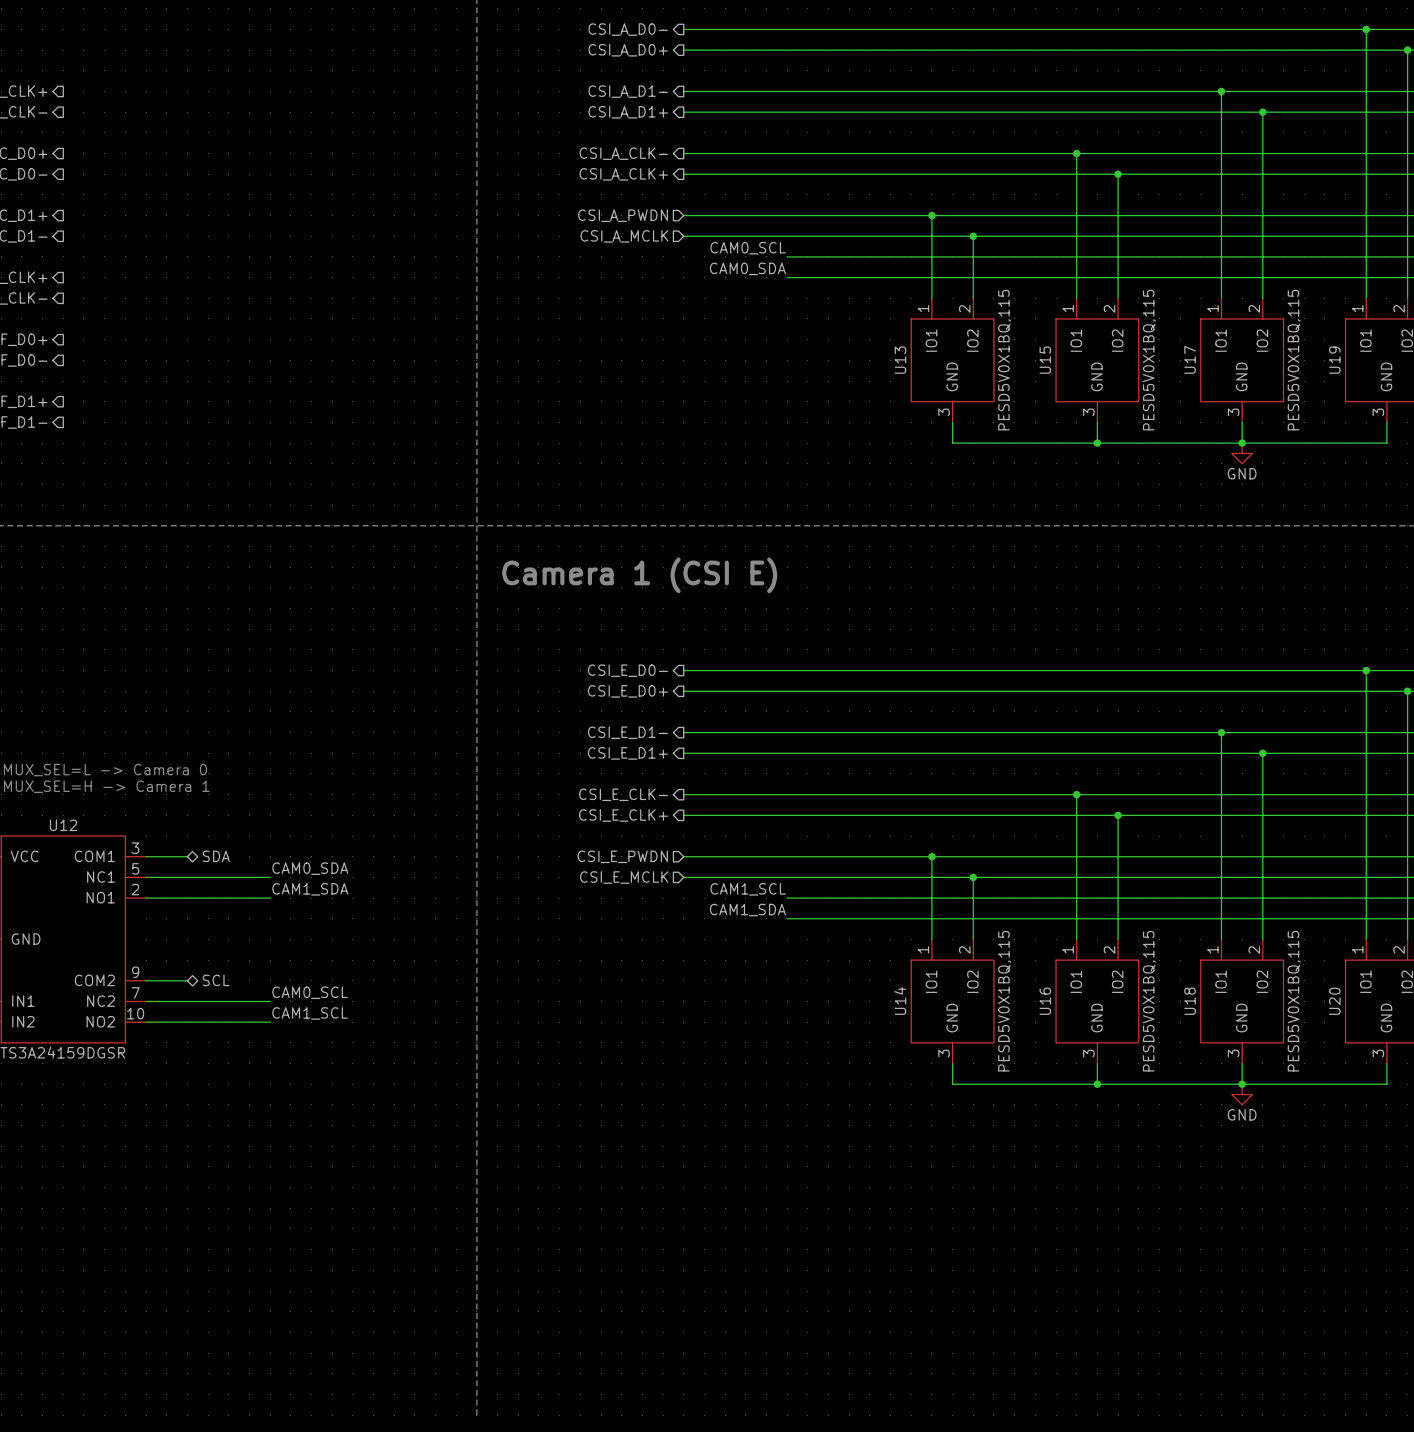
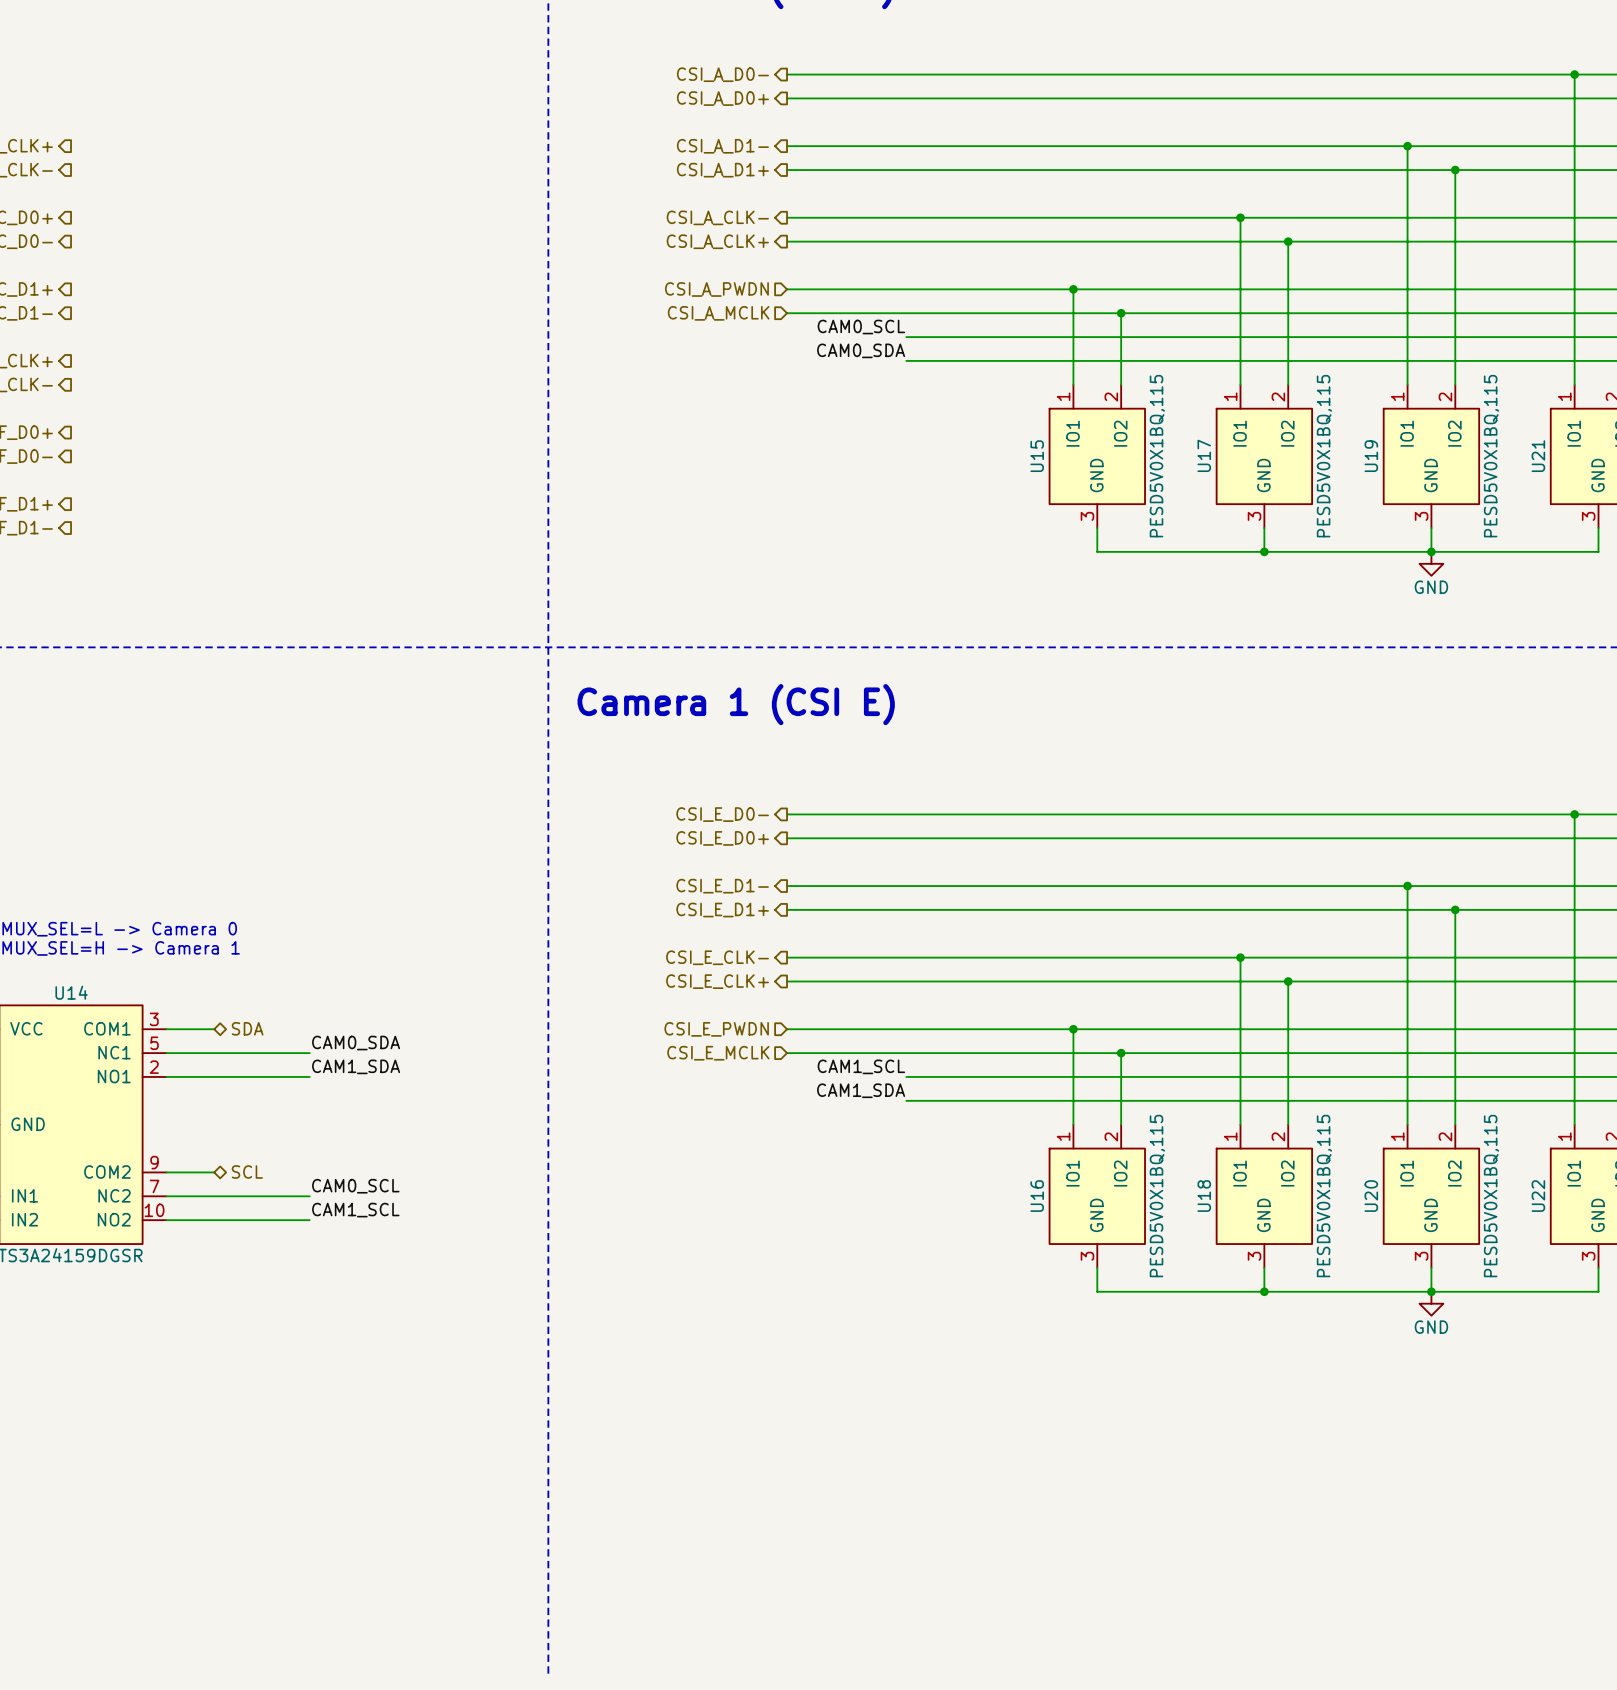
U17 name: U17 (1190, 359) -> U19 (1371, 456)
U13 name: U13 (900, 360) -> U15 (1037, 456)
U15 name: U15 (1045, 360) -> U17 (1204, 455)
U19 name: U19 (1334, 360) -> U21 (1538, 456)
U12 name: U12 (63, 825) -> U14 (71, 992)
U14 name: U14 (900, 1001) -> U16 (1037, 1196)
U16 name: U16 (1045, 1001) -> U18 (1204, 1196)
U18 name: U18 (1190, 1001) -> U20 (1371, 1196)
U20 name: U20 (1334, 1001) -> U22 (1538, 1196)

